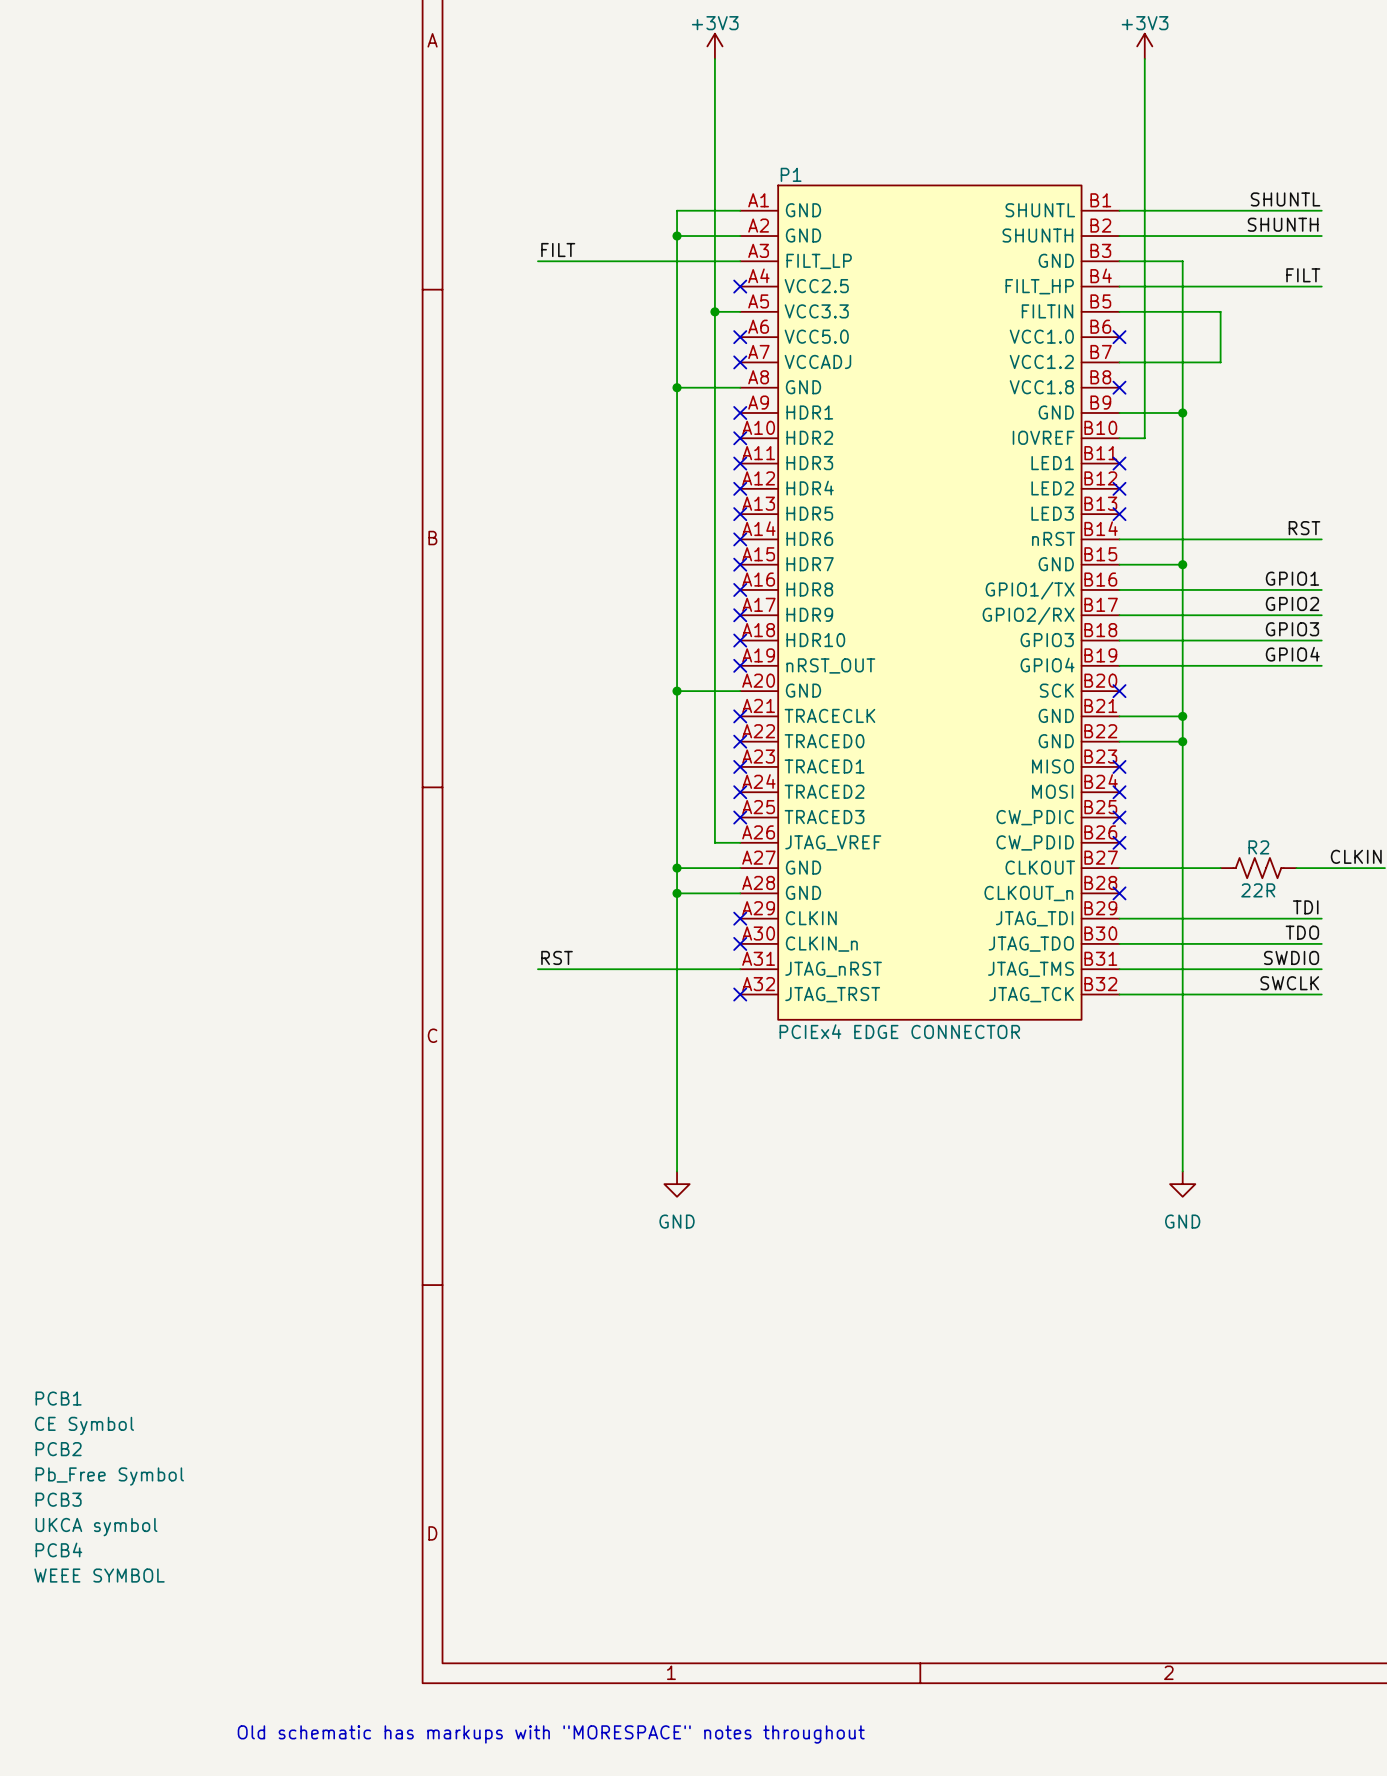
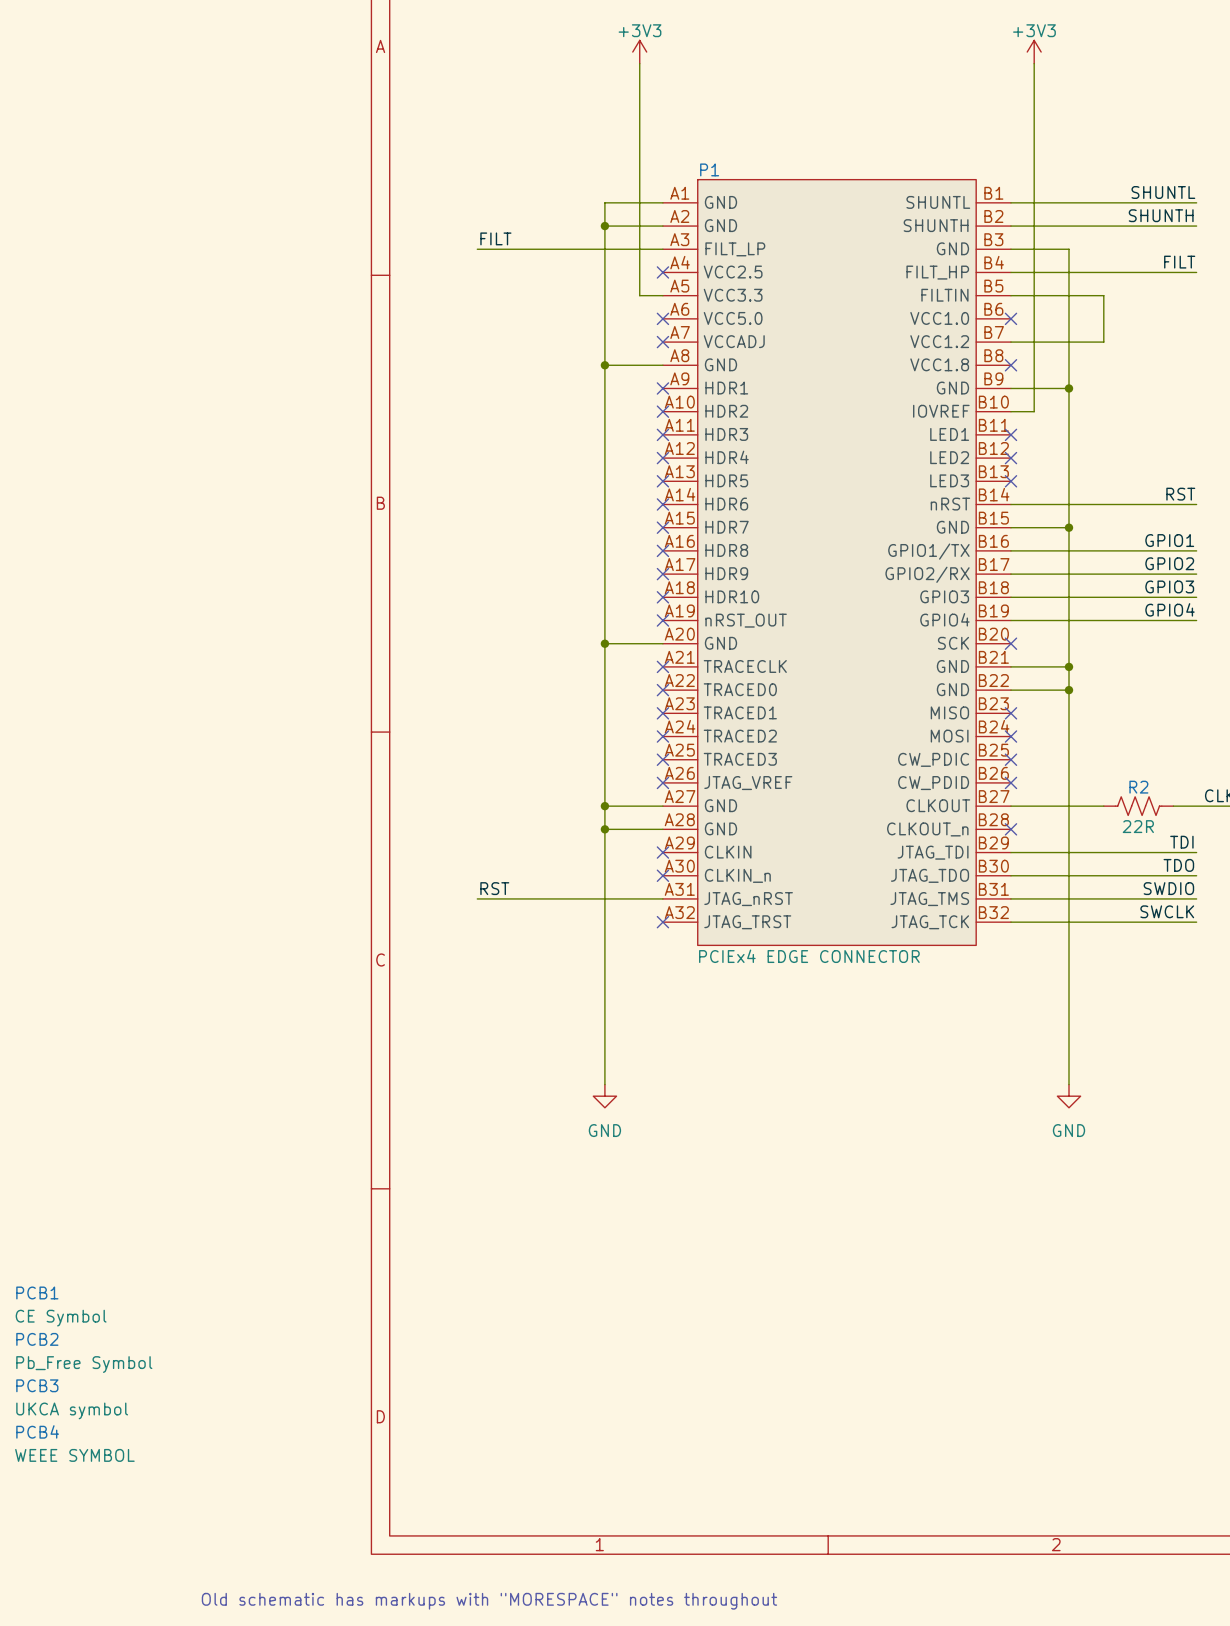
wire: (714, 311) (714, 842) (740, 842) -> none
junction: (714, 311) -> none
no-connect mark: none -> (662, 782)

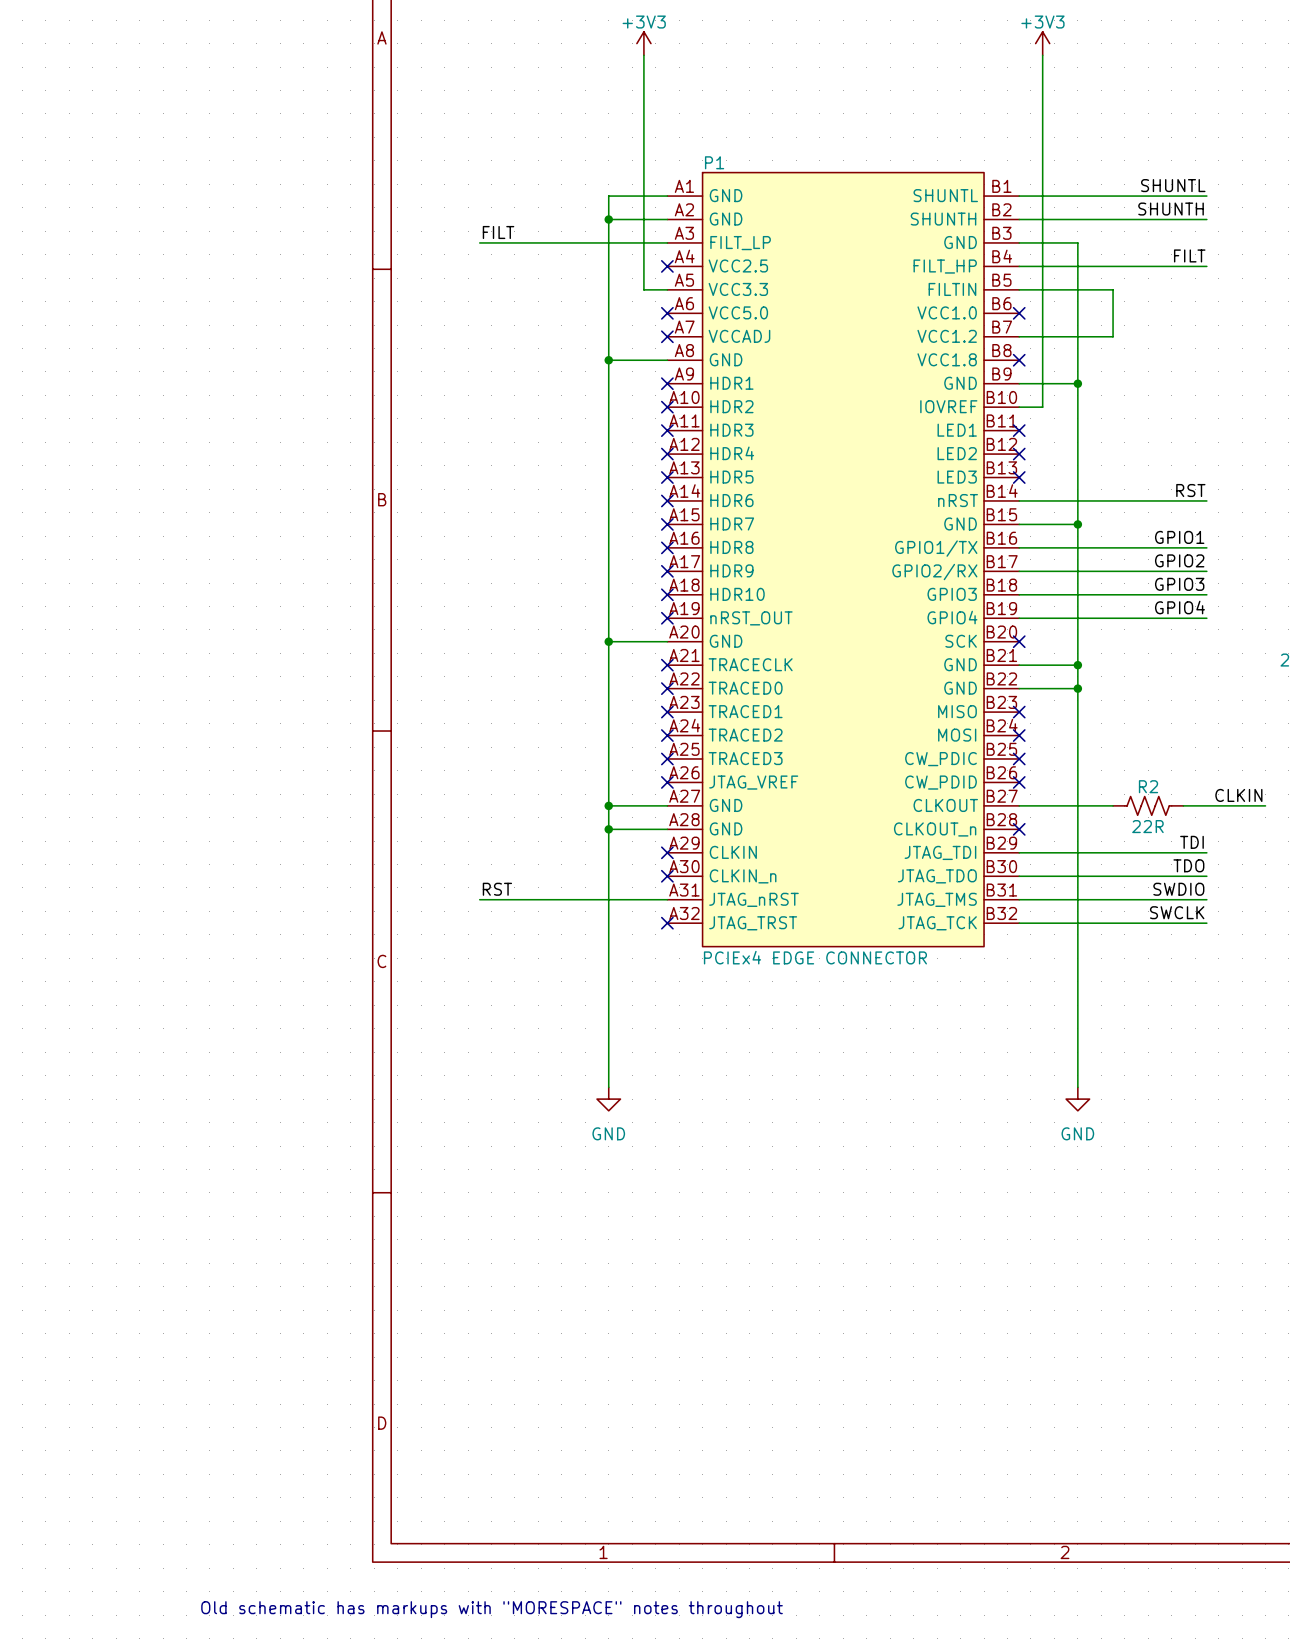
PCB1: CE Symbol (61, 1306) -> none
PCB2: Pb_Free Symbol (84, 1352) -> none
PCB3: UKCA symbol (72, 1399) -> none
PCB4: WEEE SYMBOL (74, 1443) -> none

